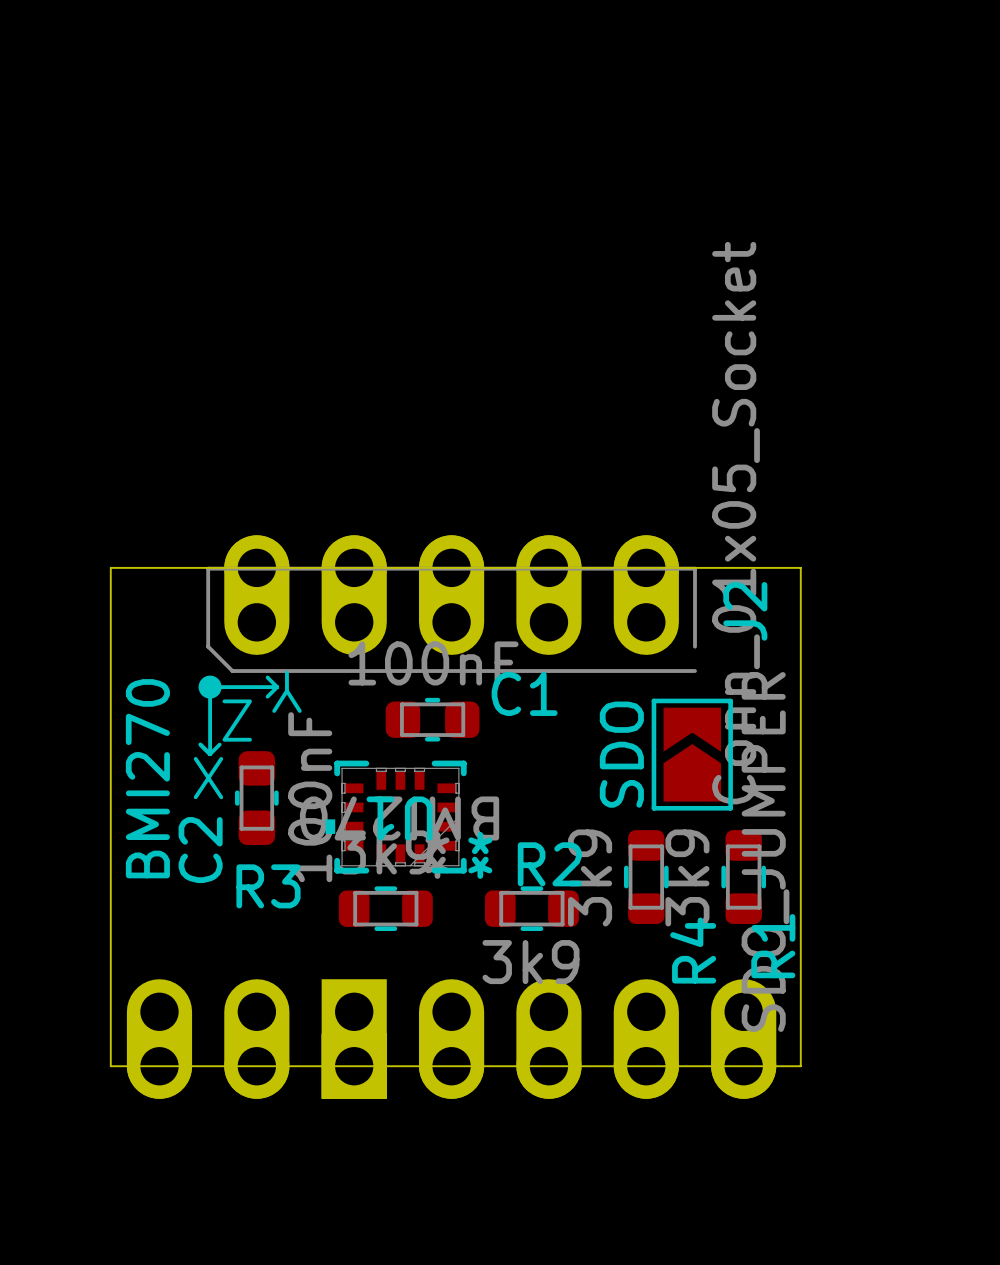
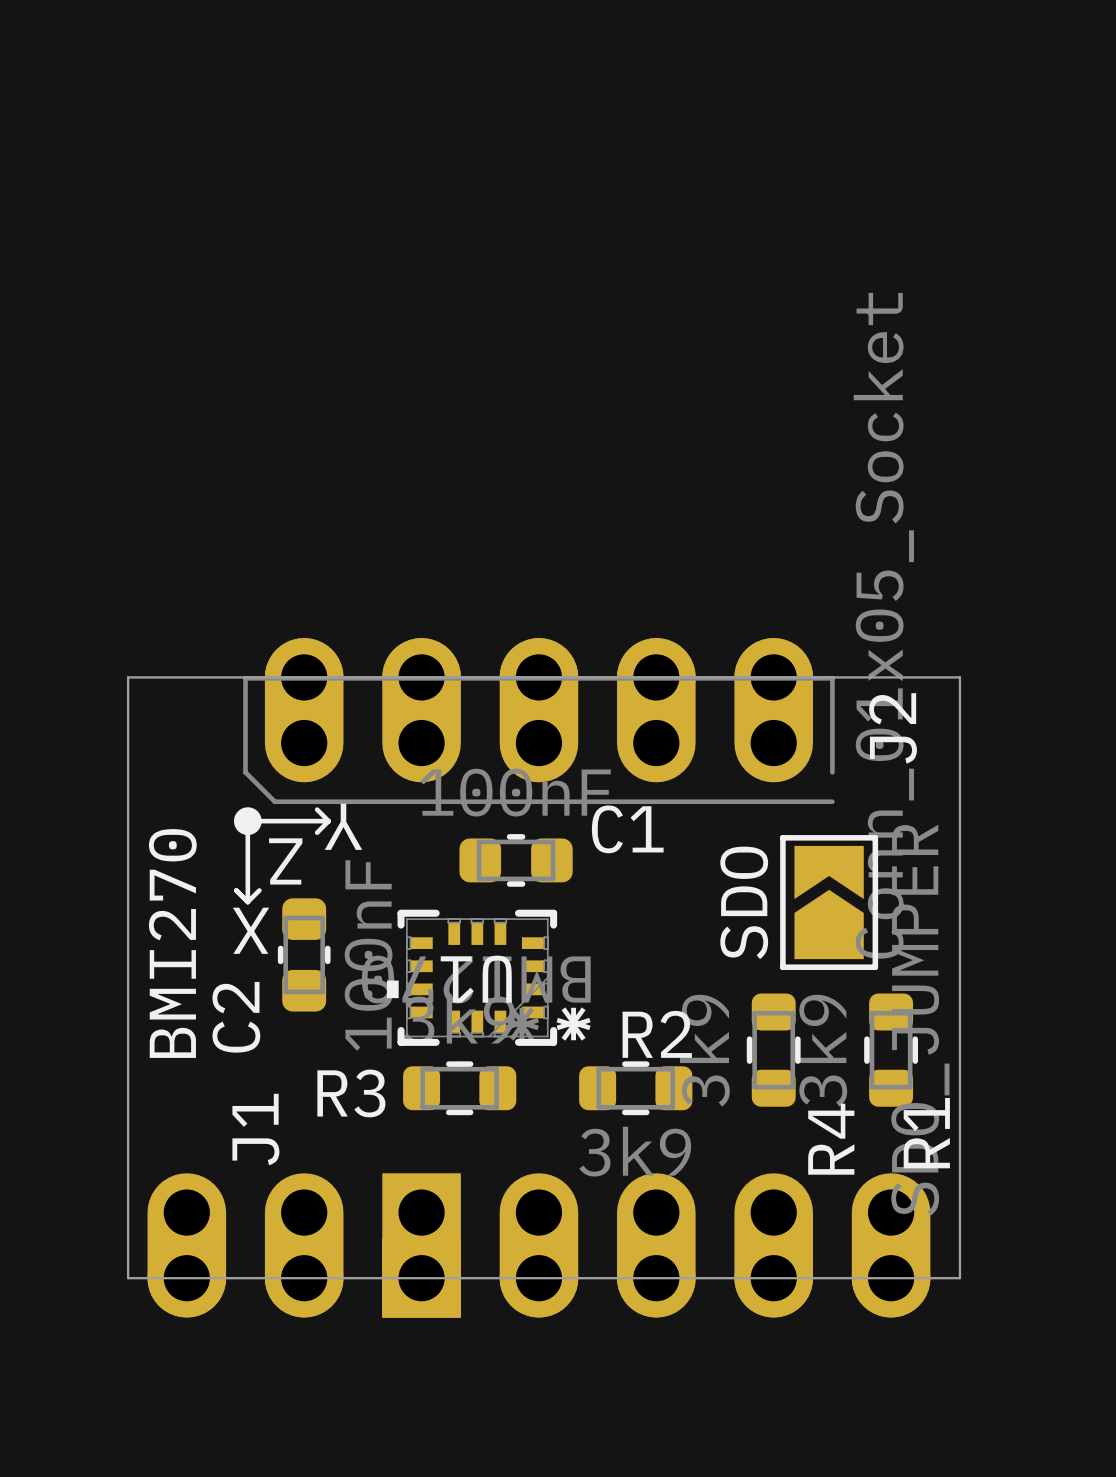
R3 name position: R3 (268, 886) -> R3 (351, 1093)
text: none -> J1 (255, 1129)

